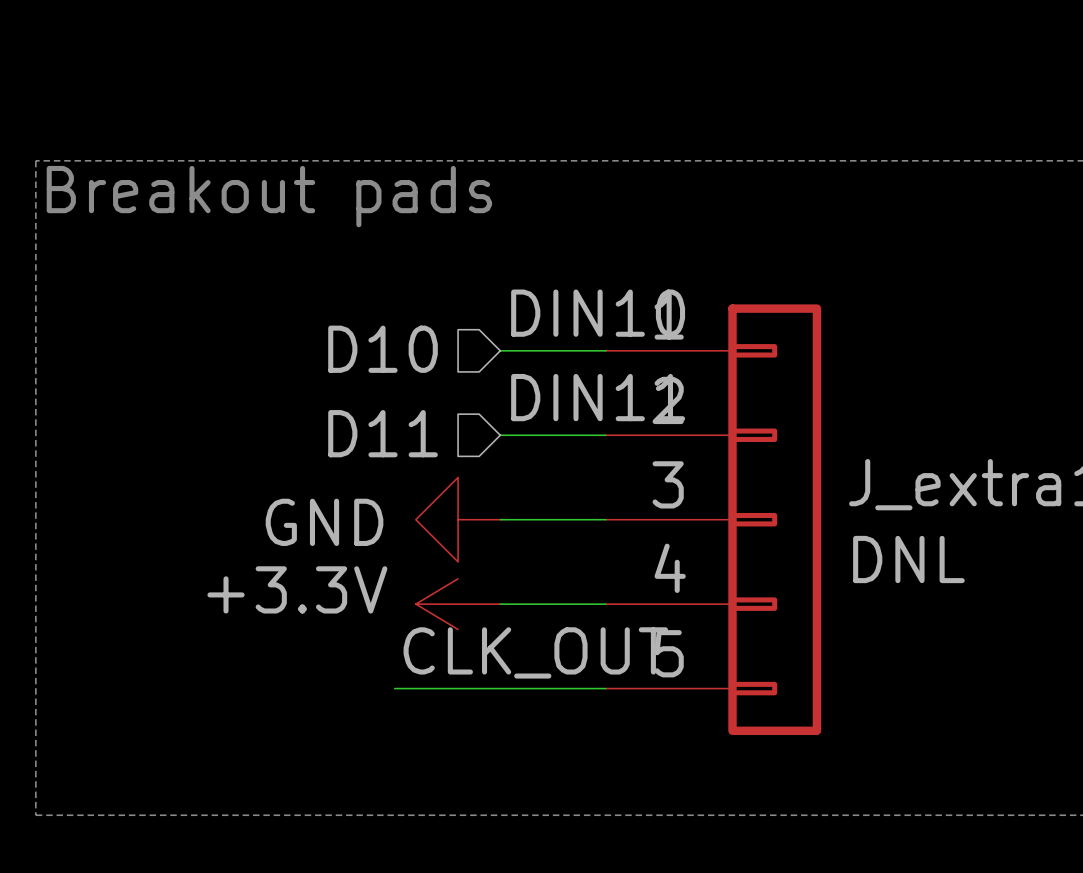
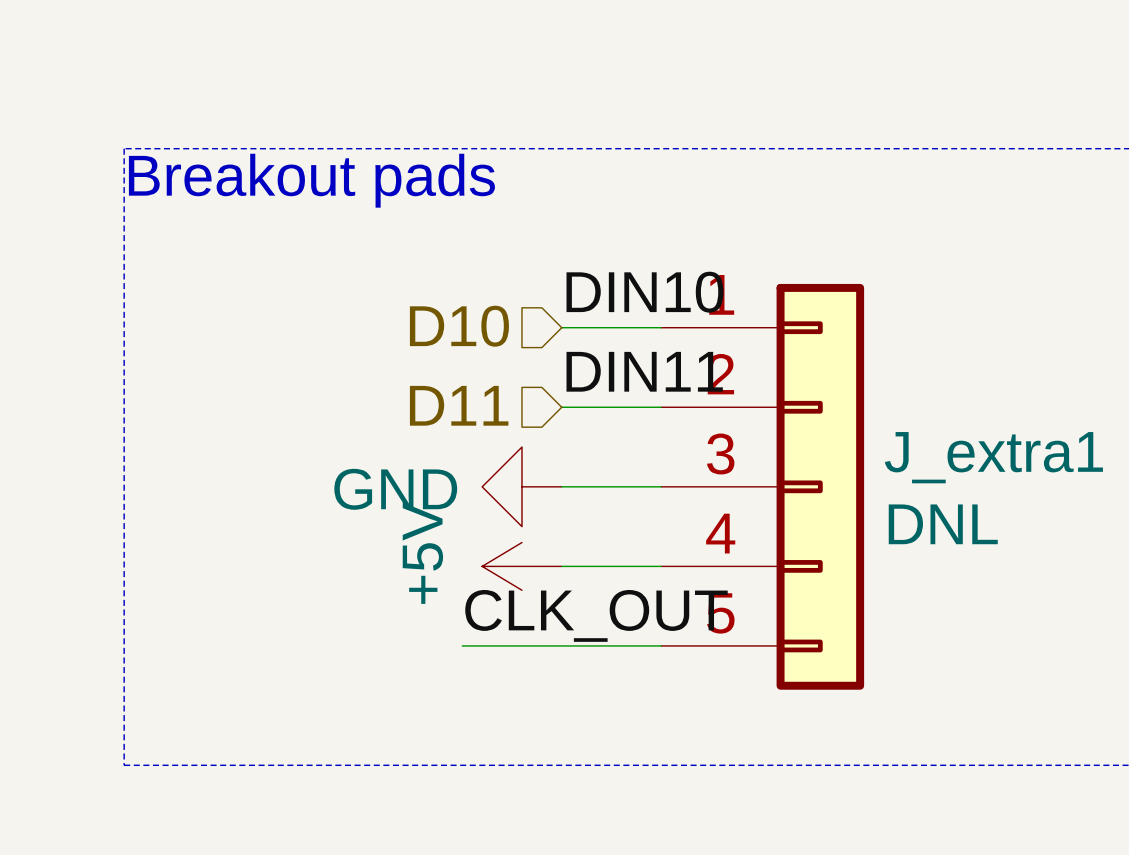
power symbol: +3.3V (458, 604) -> +5V (521, 566)

